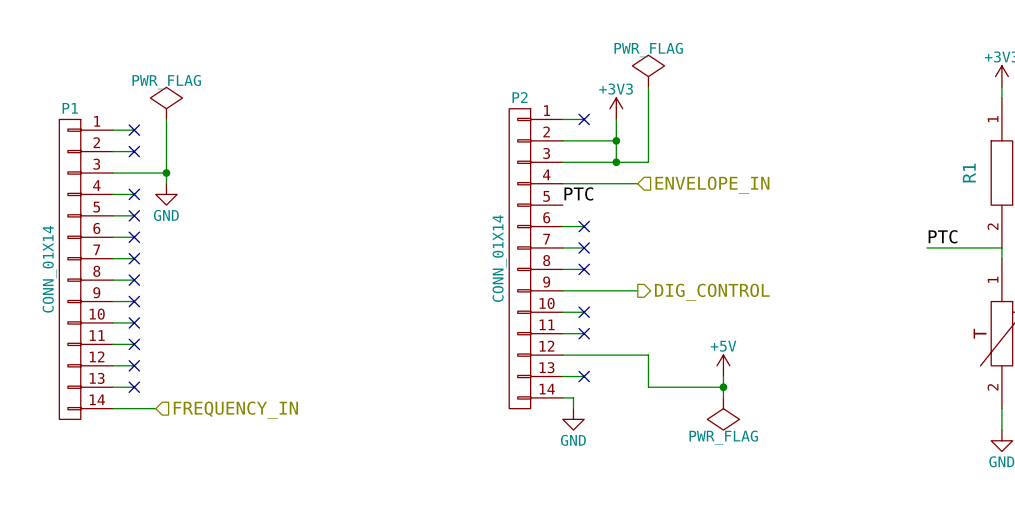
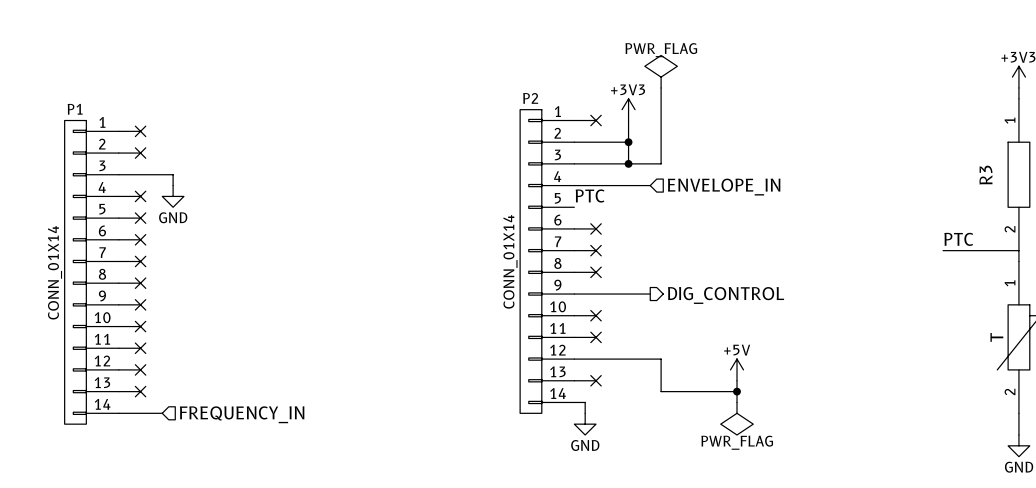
power symbol: PWR_FLAG (166, 103) -> none
wire: (166, 119) (166, 173) -> none
R1 name: R1 (969, 172) -> R3 (985, 175)
junction: (166, 173) -> none

